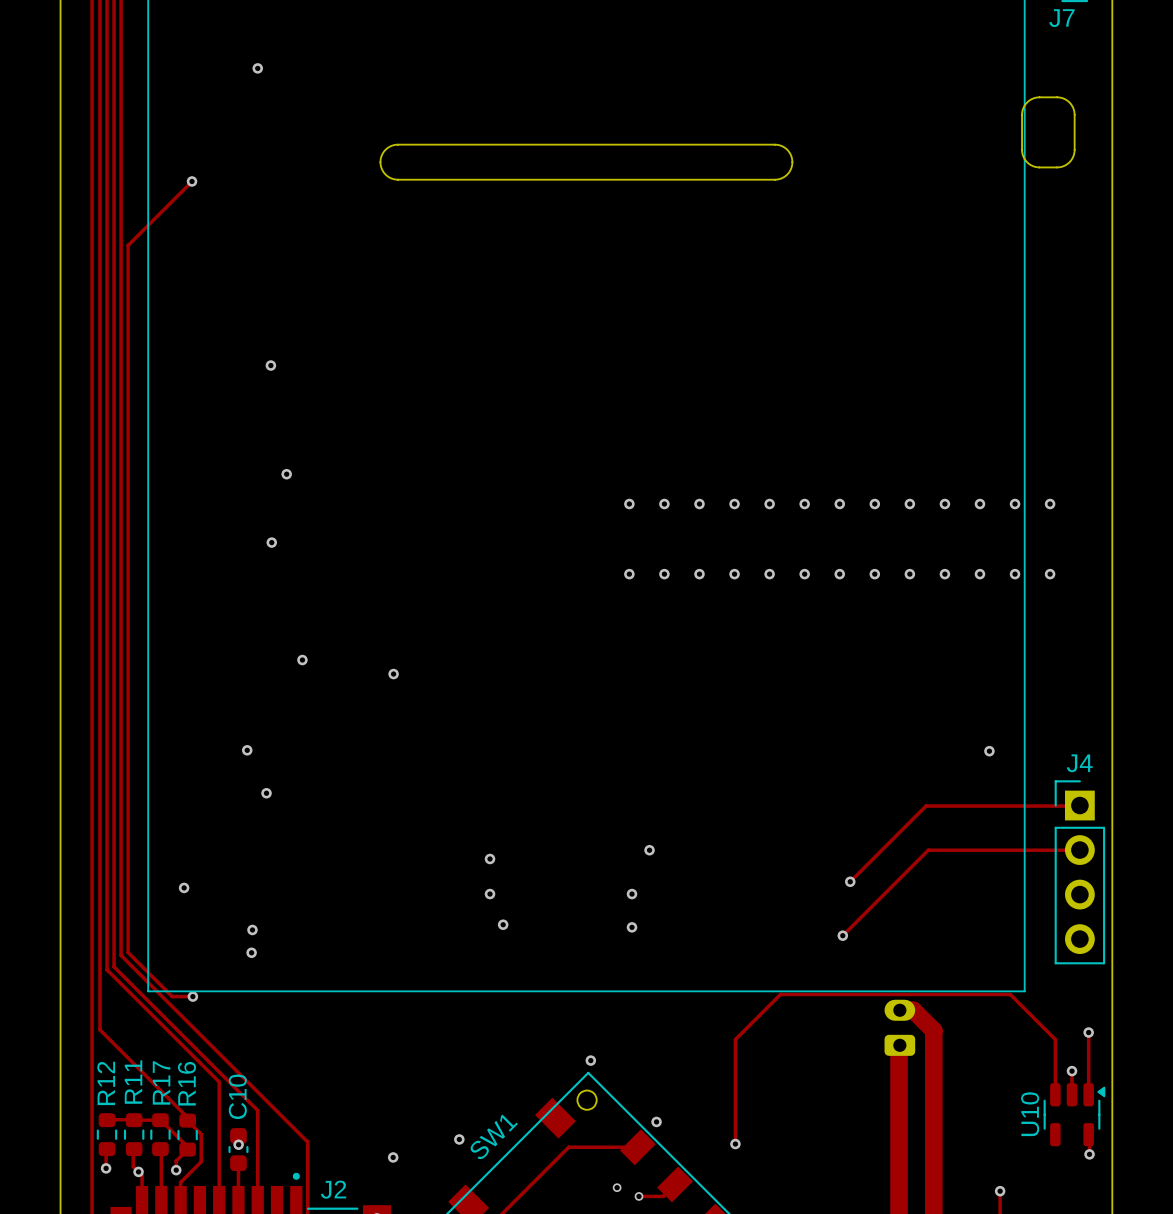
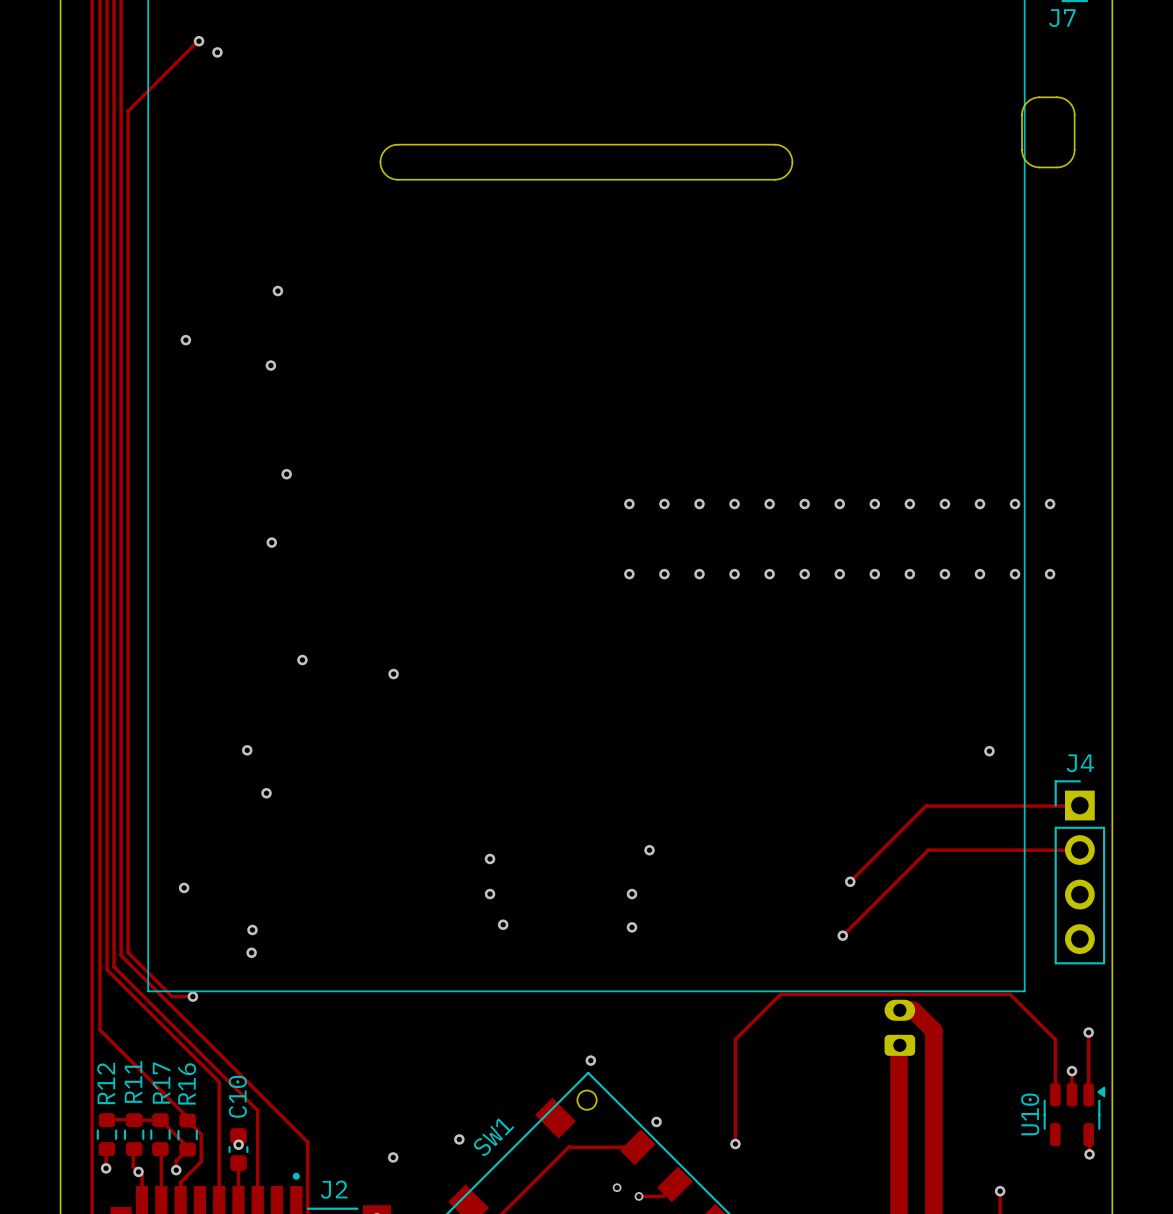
via: none -> (199, 41)
via: none -> (217, 52)
via: (257, 68) -> none
track: (192, 181) (128, 245) -> (199, 41) (128, 111) (128, 245)
via: (192, 181) -> none
via: none -> (277, 291)
via: none -> (185, 340)

